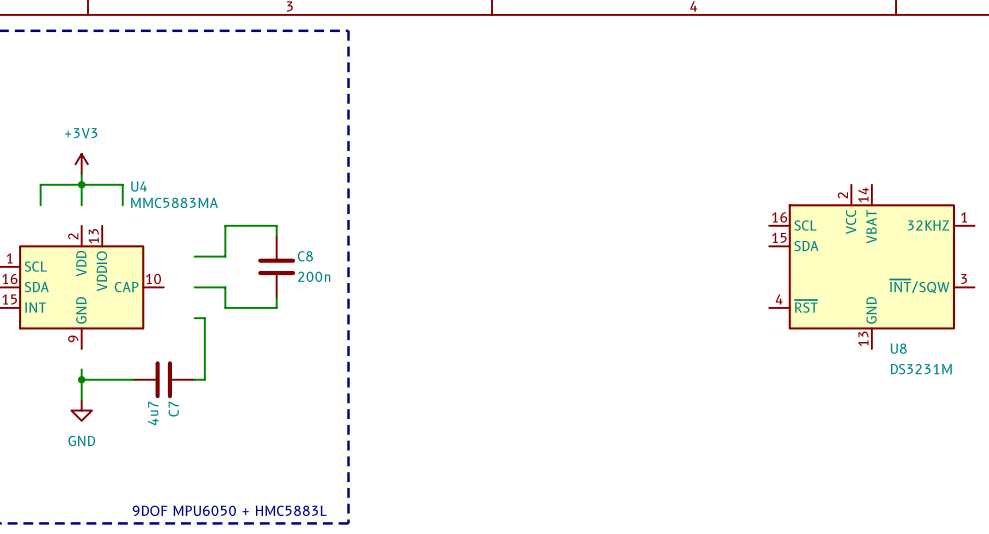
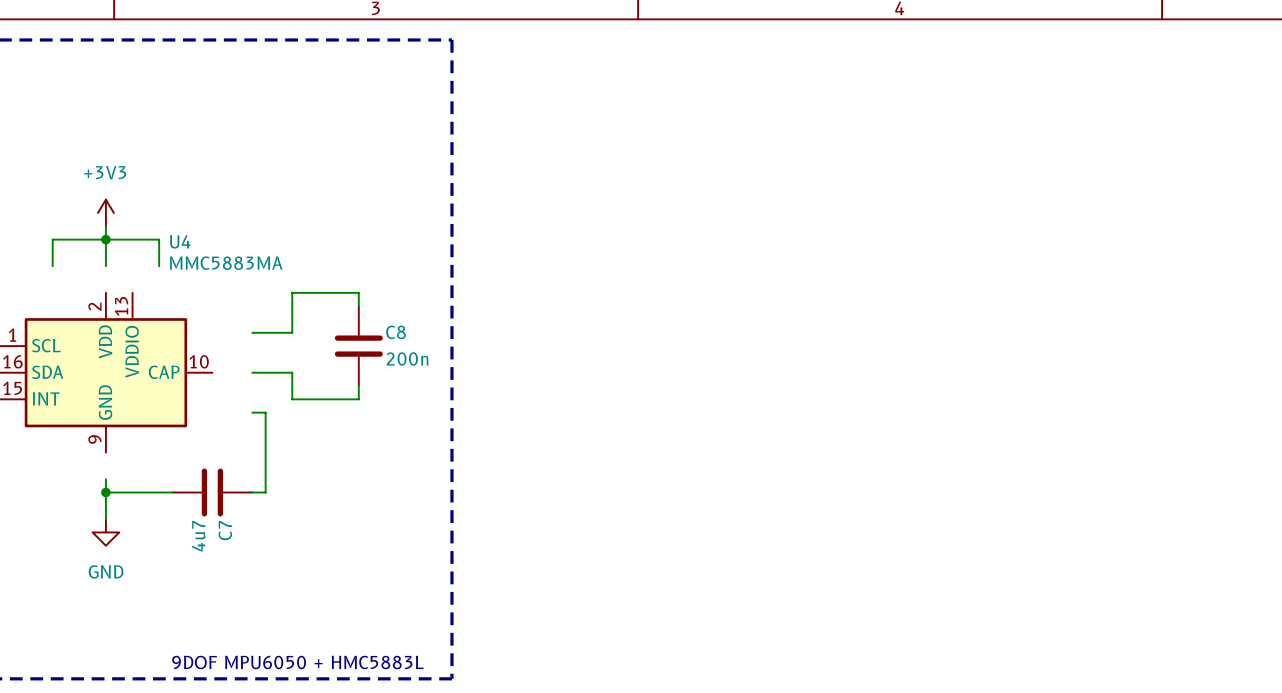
U8: DS3231M (871, 266) -> none

